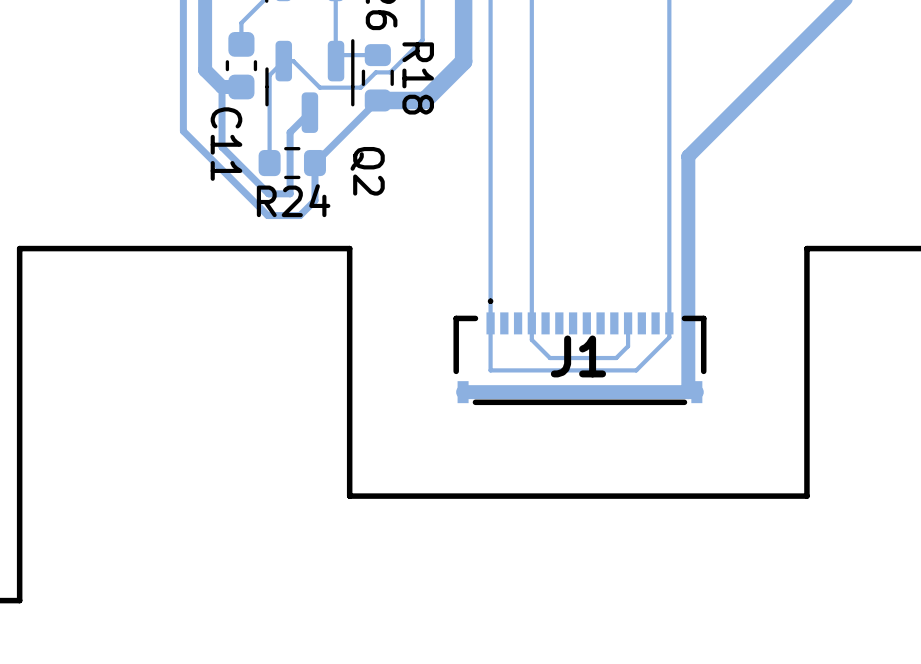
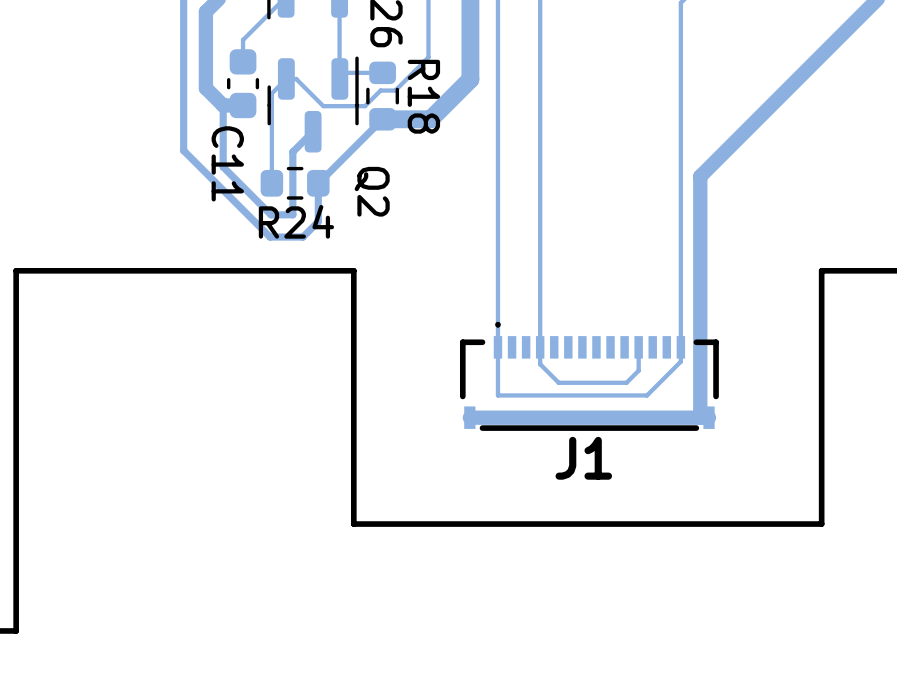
J1 name position: J1 (578, 356) -> J1 (583, 458)

